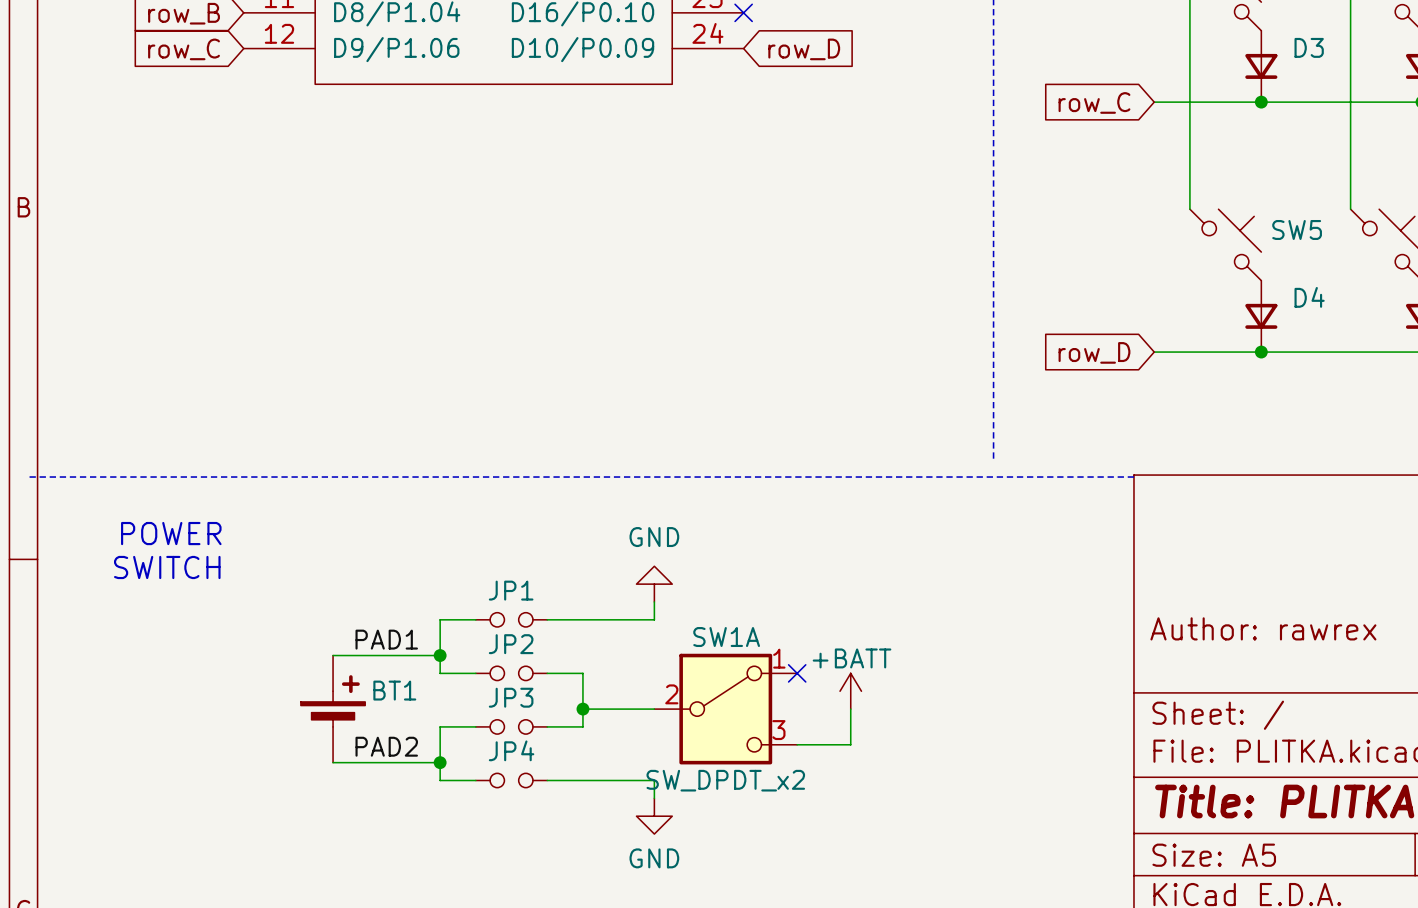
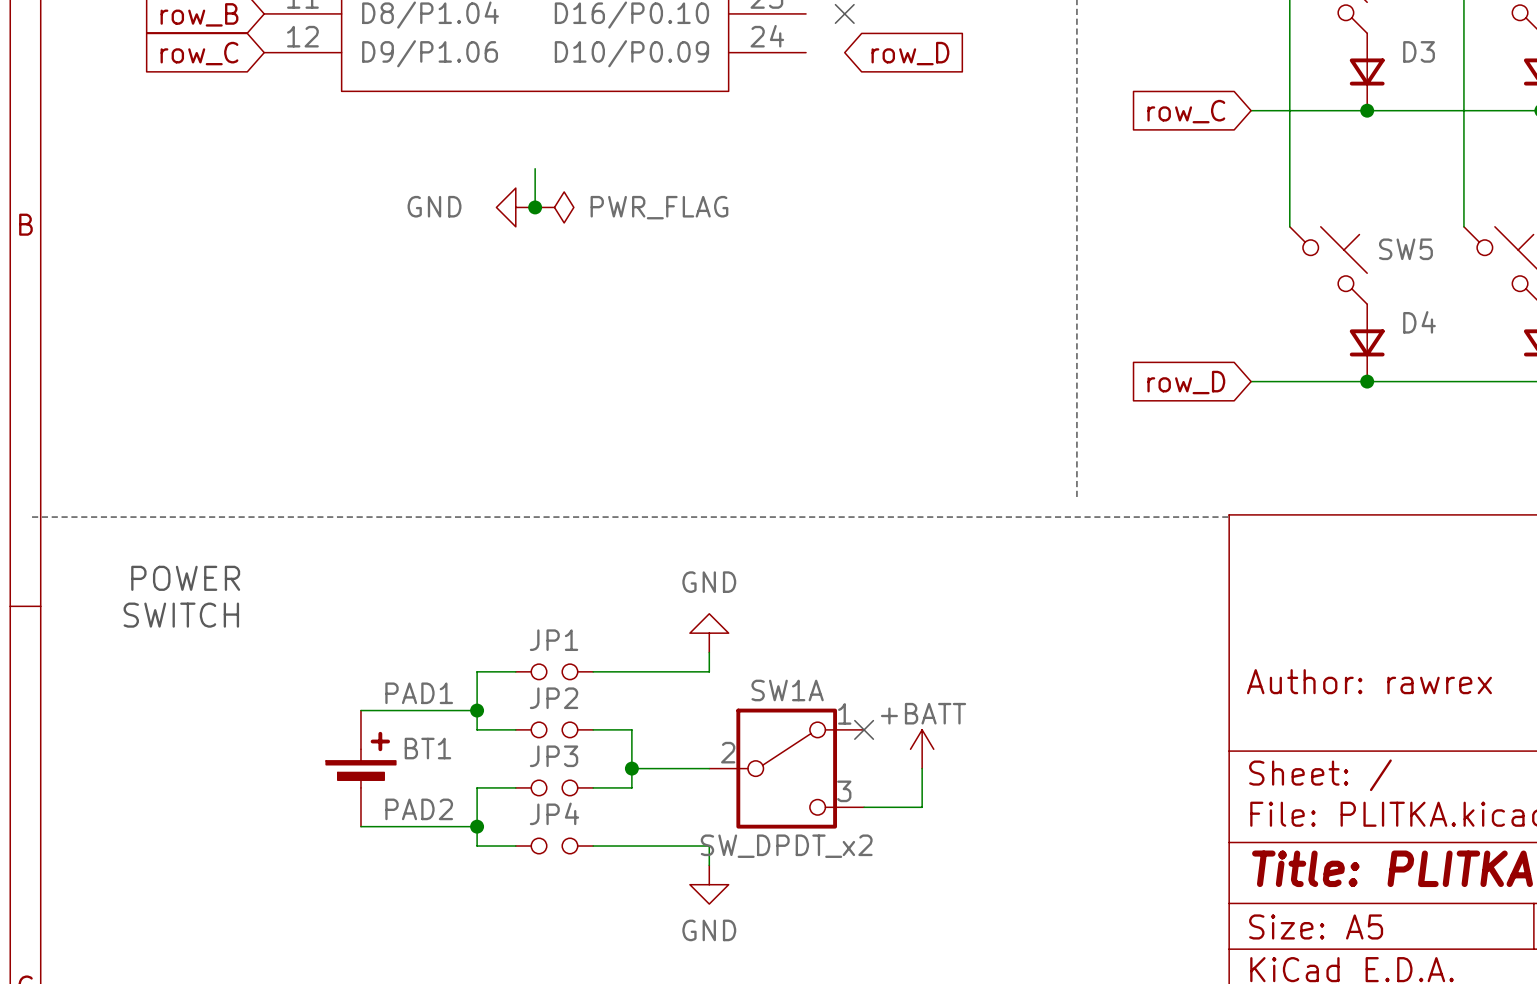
no-connect mark: (743, 12) -> none
no-connect mark: none -> (844, 13)
global label position: row_D (804, 49) -> row_D (910, 53)
wire: none -> (535, 168) (535, 207)
power symbol: none -> GND (515, 207)
junction: none -> (535, 207)
power symbol: none -> PWR_FLAG (554, 207)

